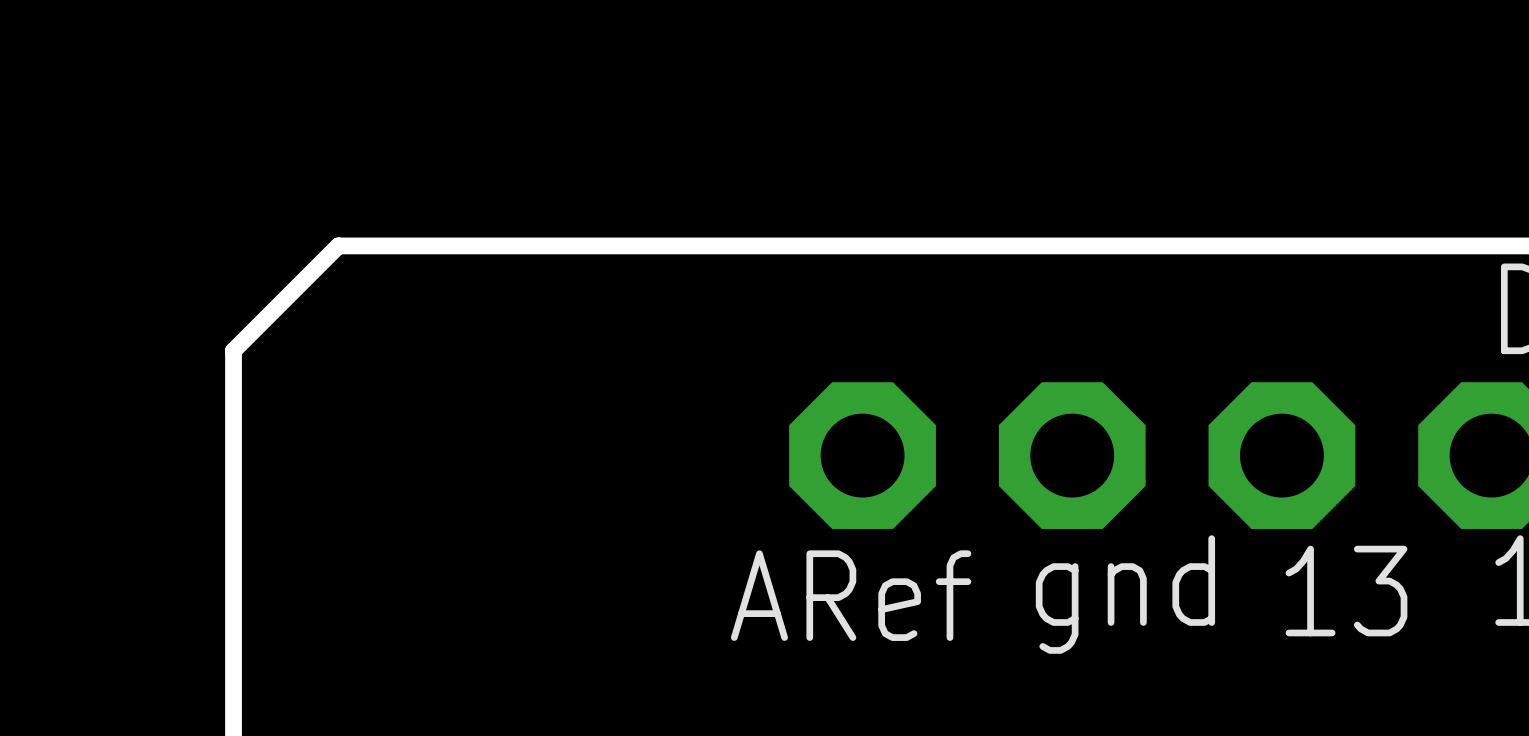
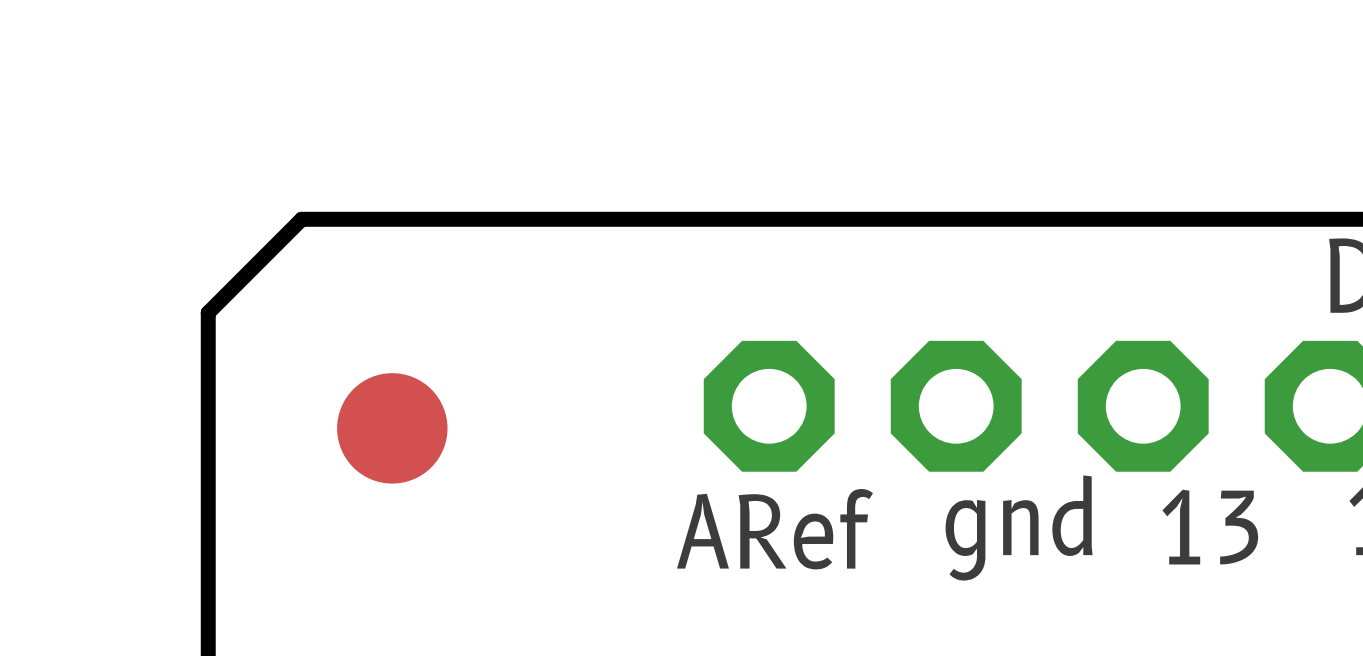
part: none -> (392, 428)

